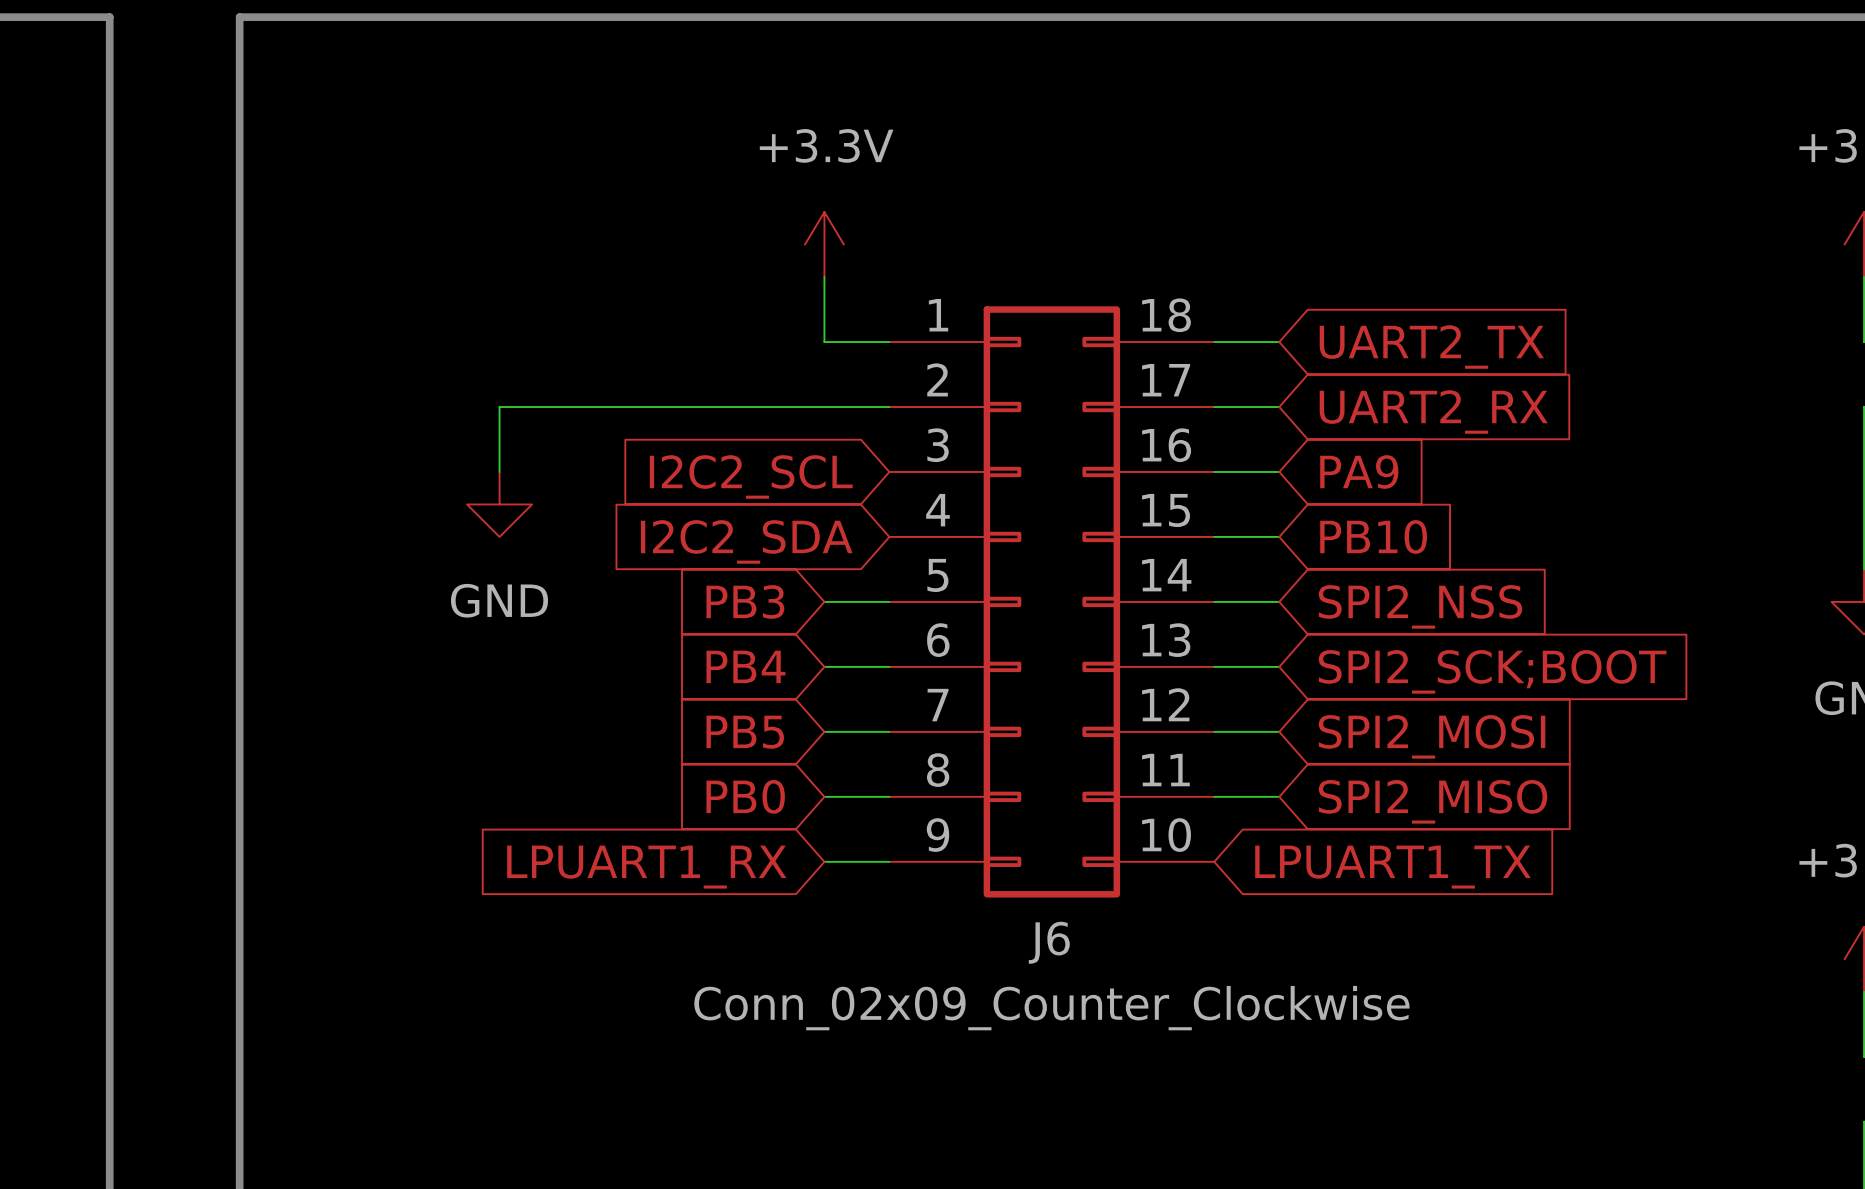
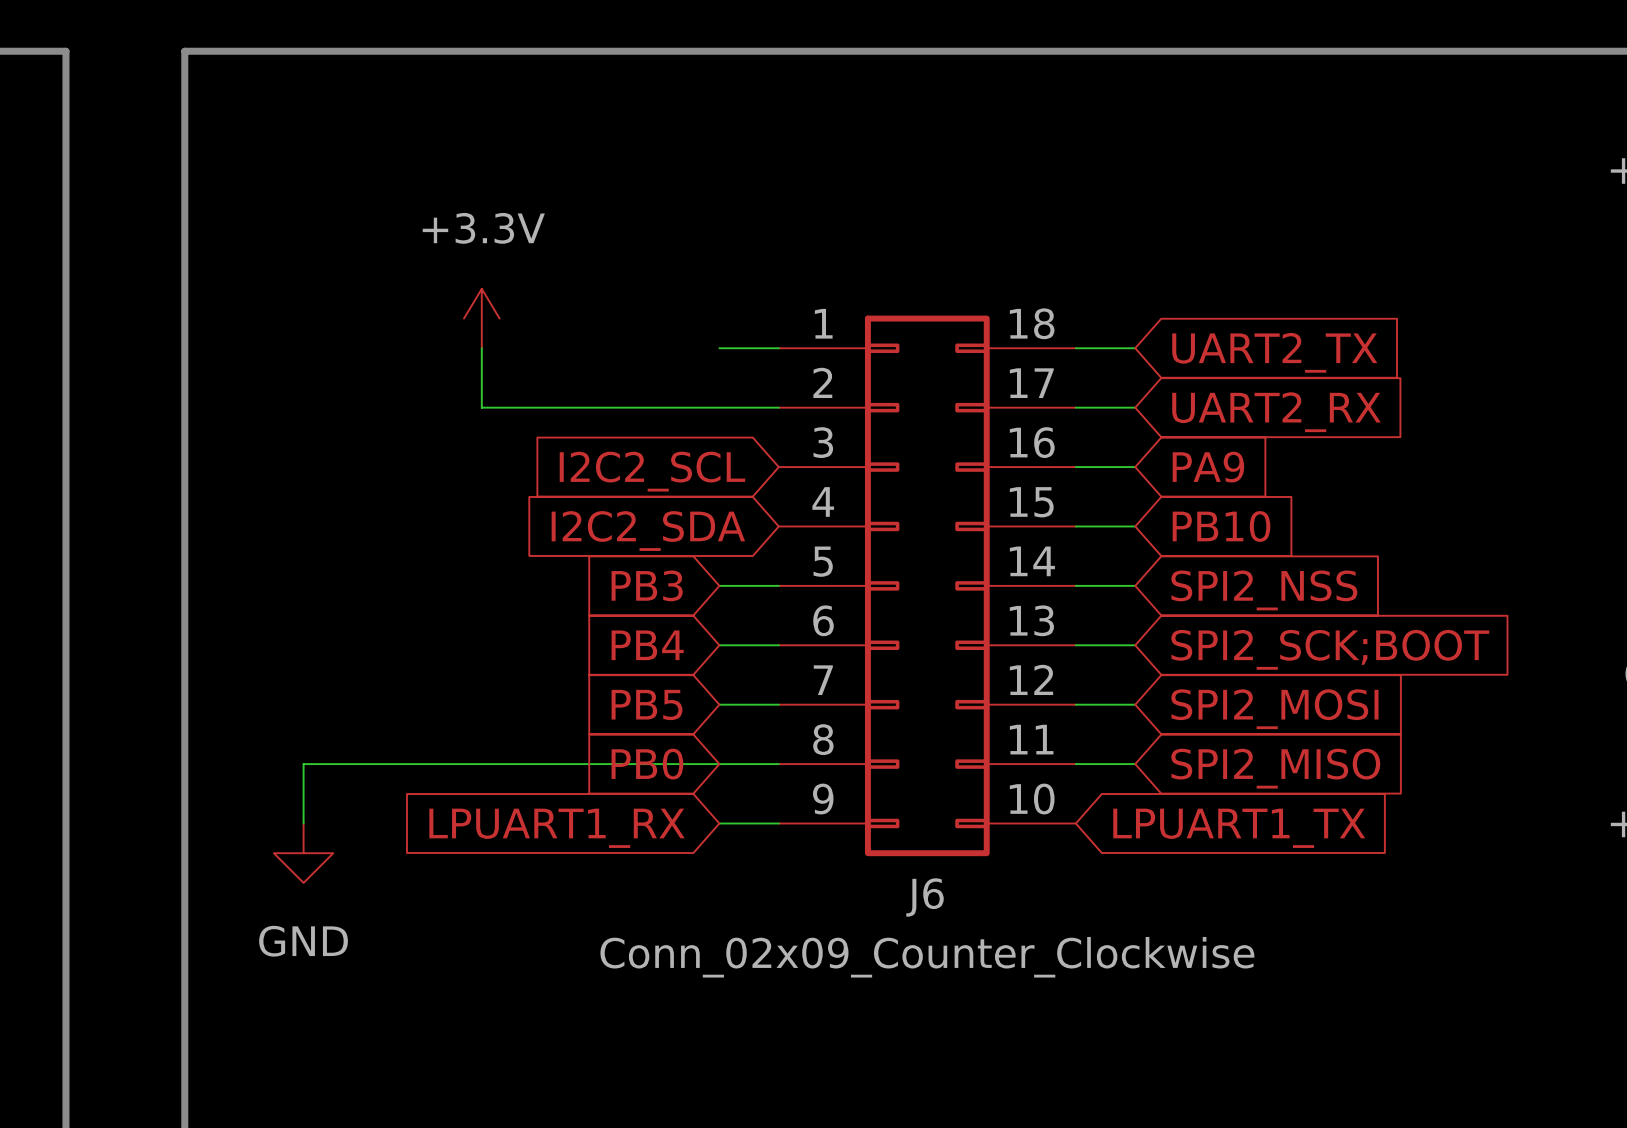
power symbol position: +3.3V (824, 244) -> +3.3V (481, 318)
wire: (824, 277) (824, 342) -> none
wire: (564, 407) (499, 407) (499, 471) -> (481, 407) (481, 348)
power symbol position: GND (499, 504) -> GND (303, 853)
wire: none -> (719, 764) (303, 764) (303, 823)

